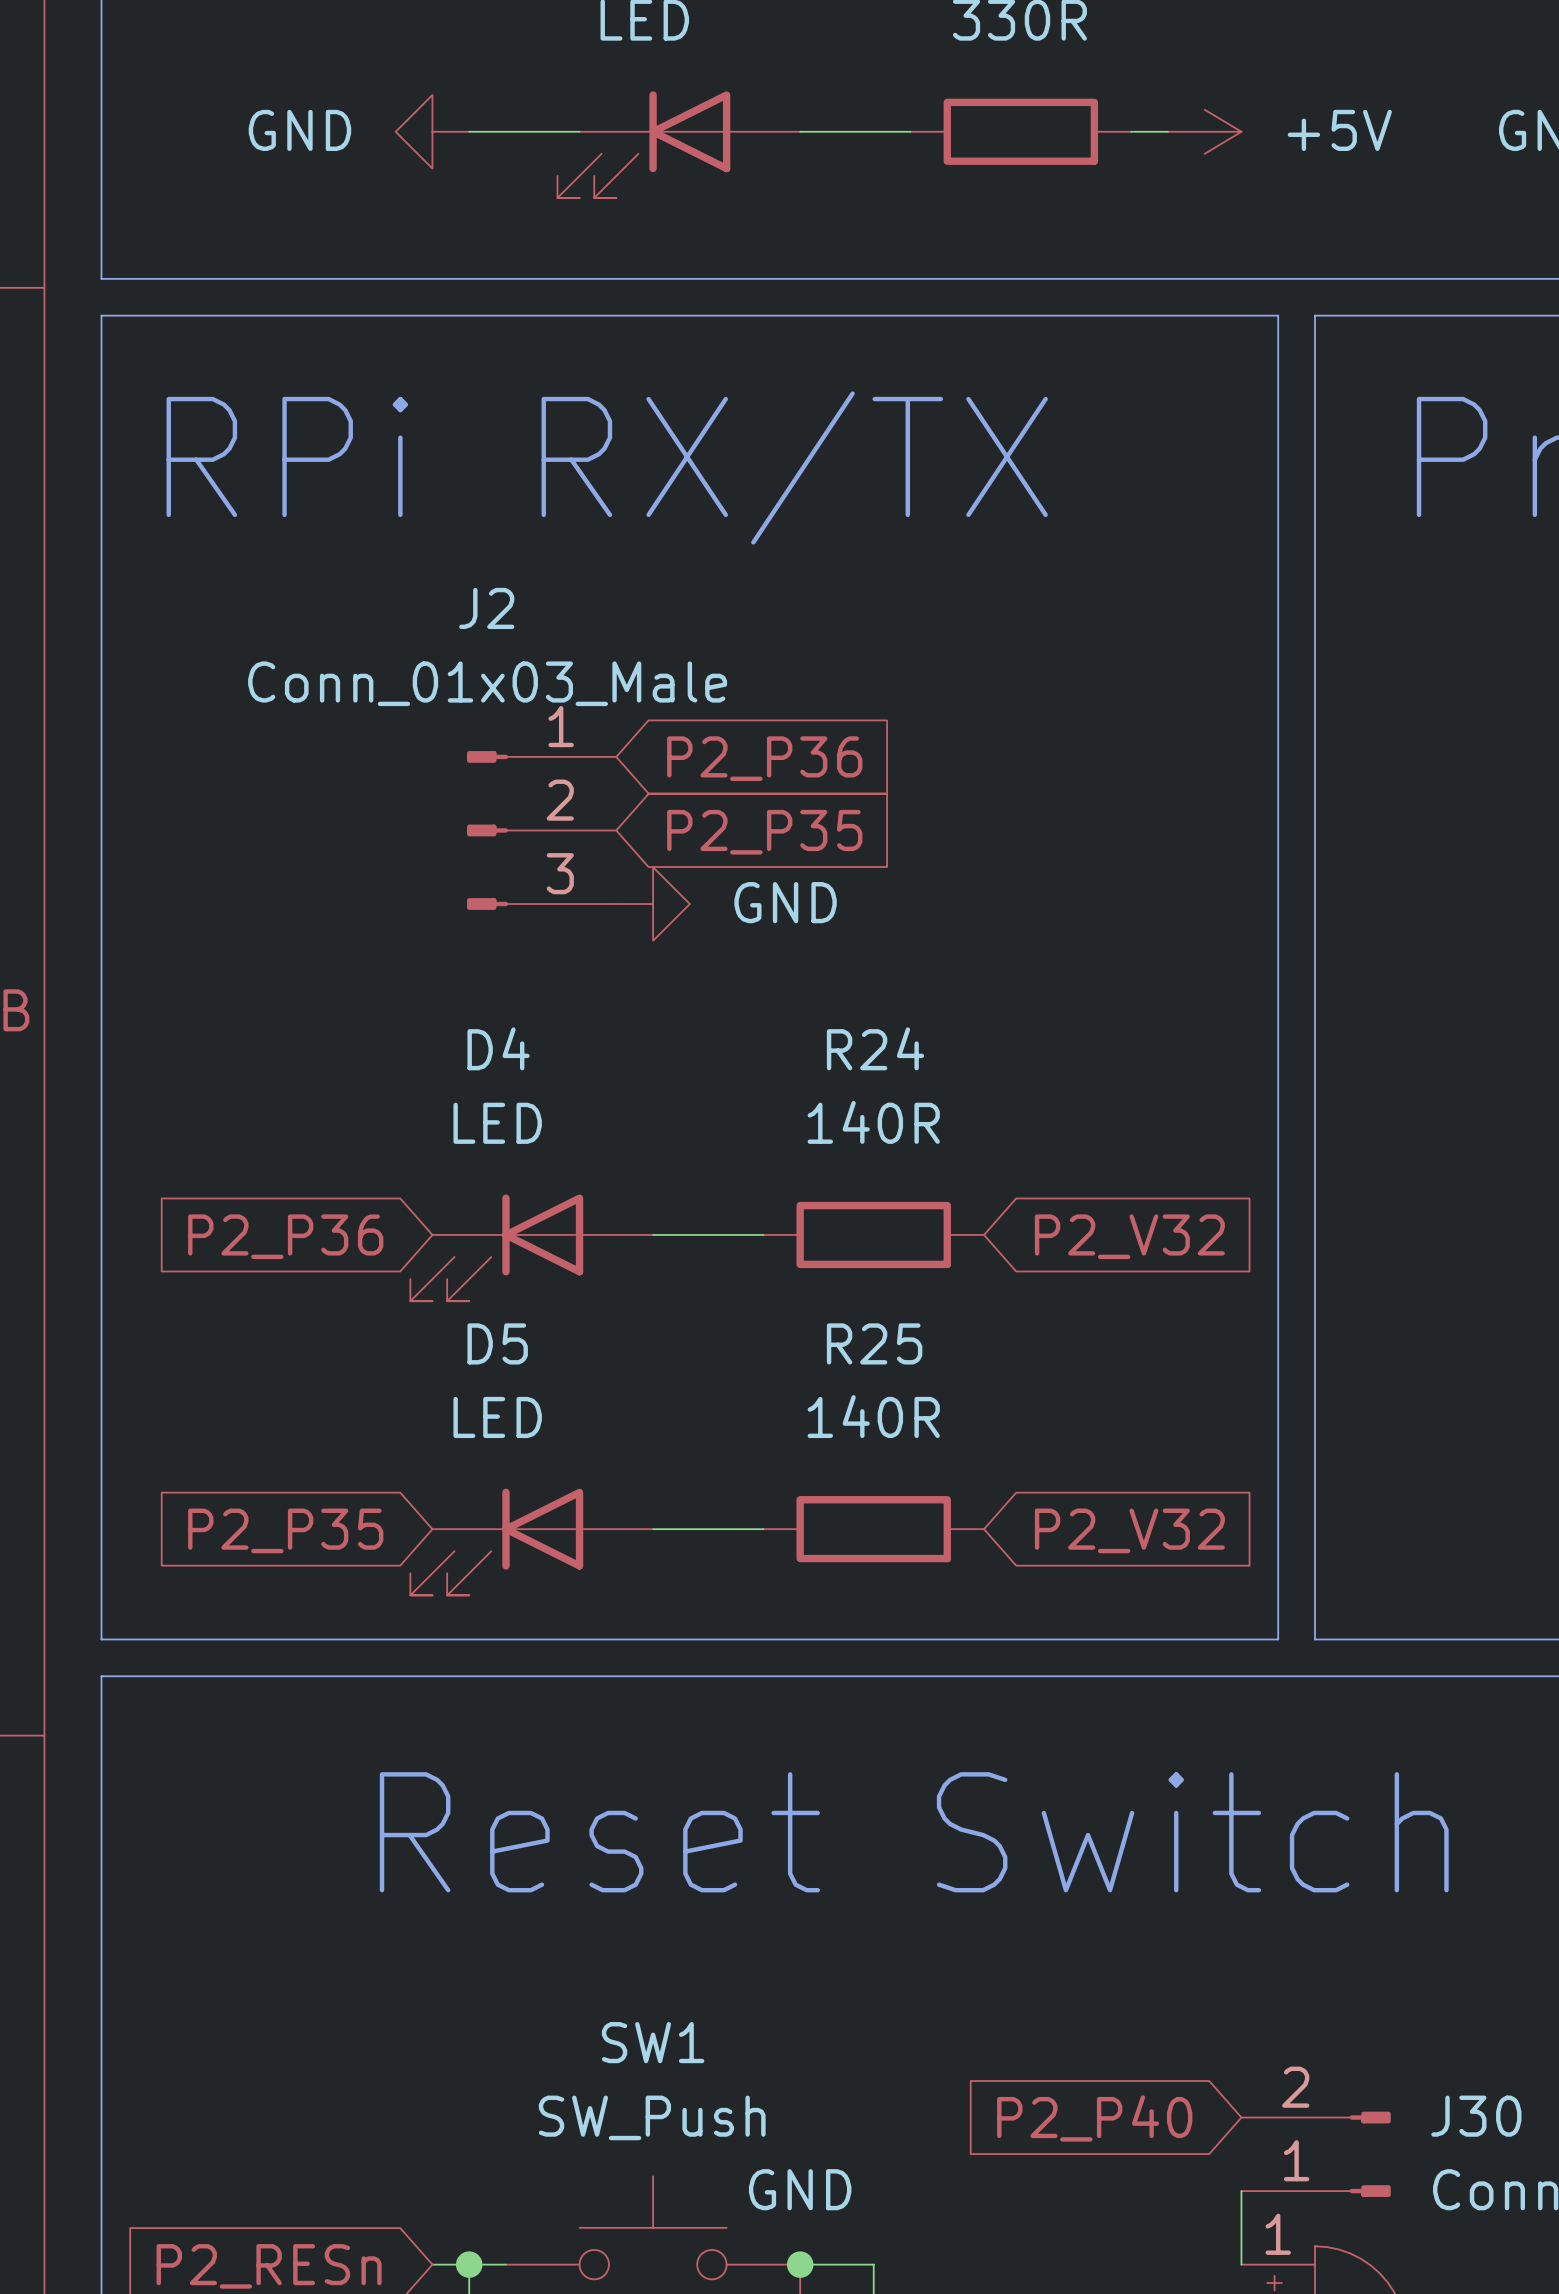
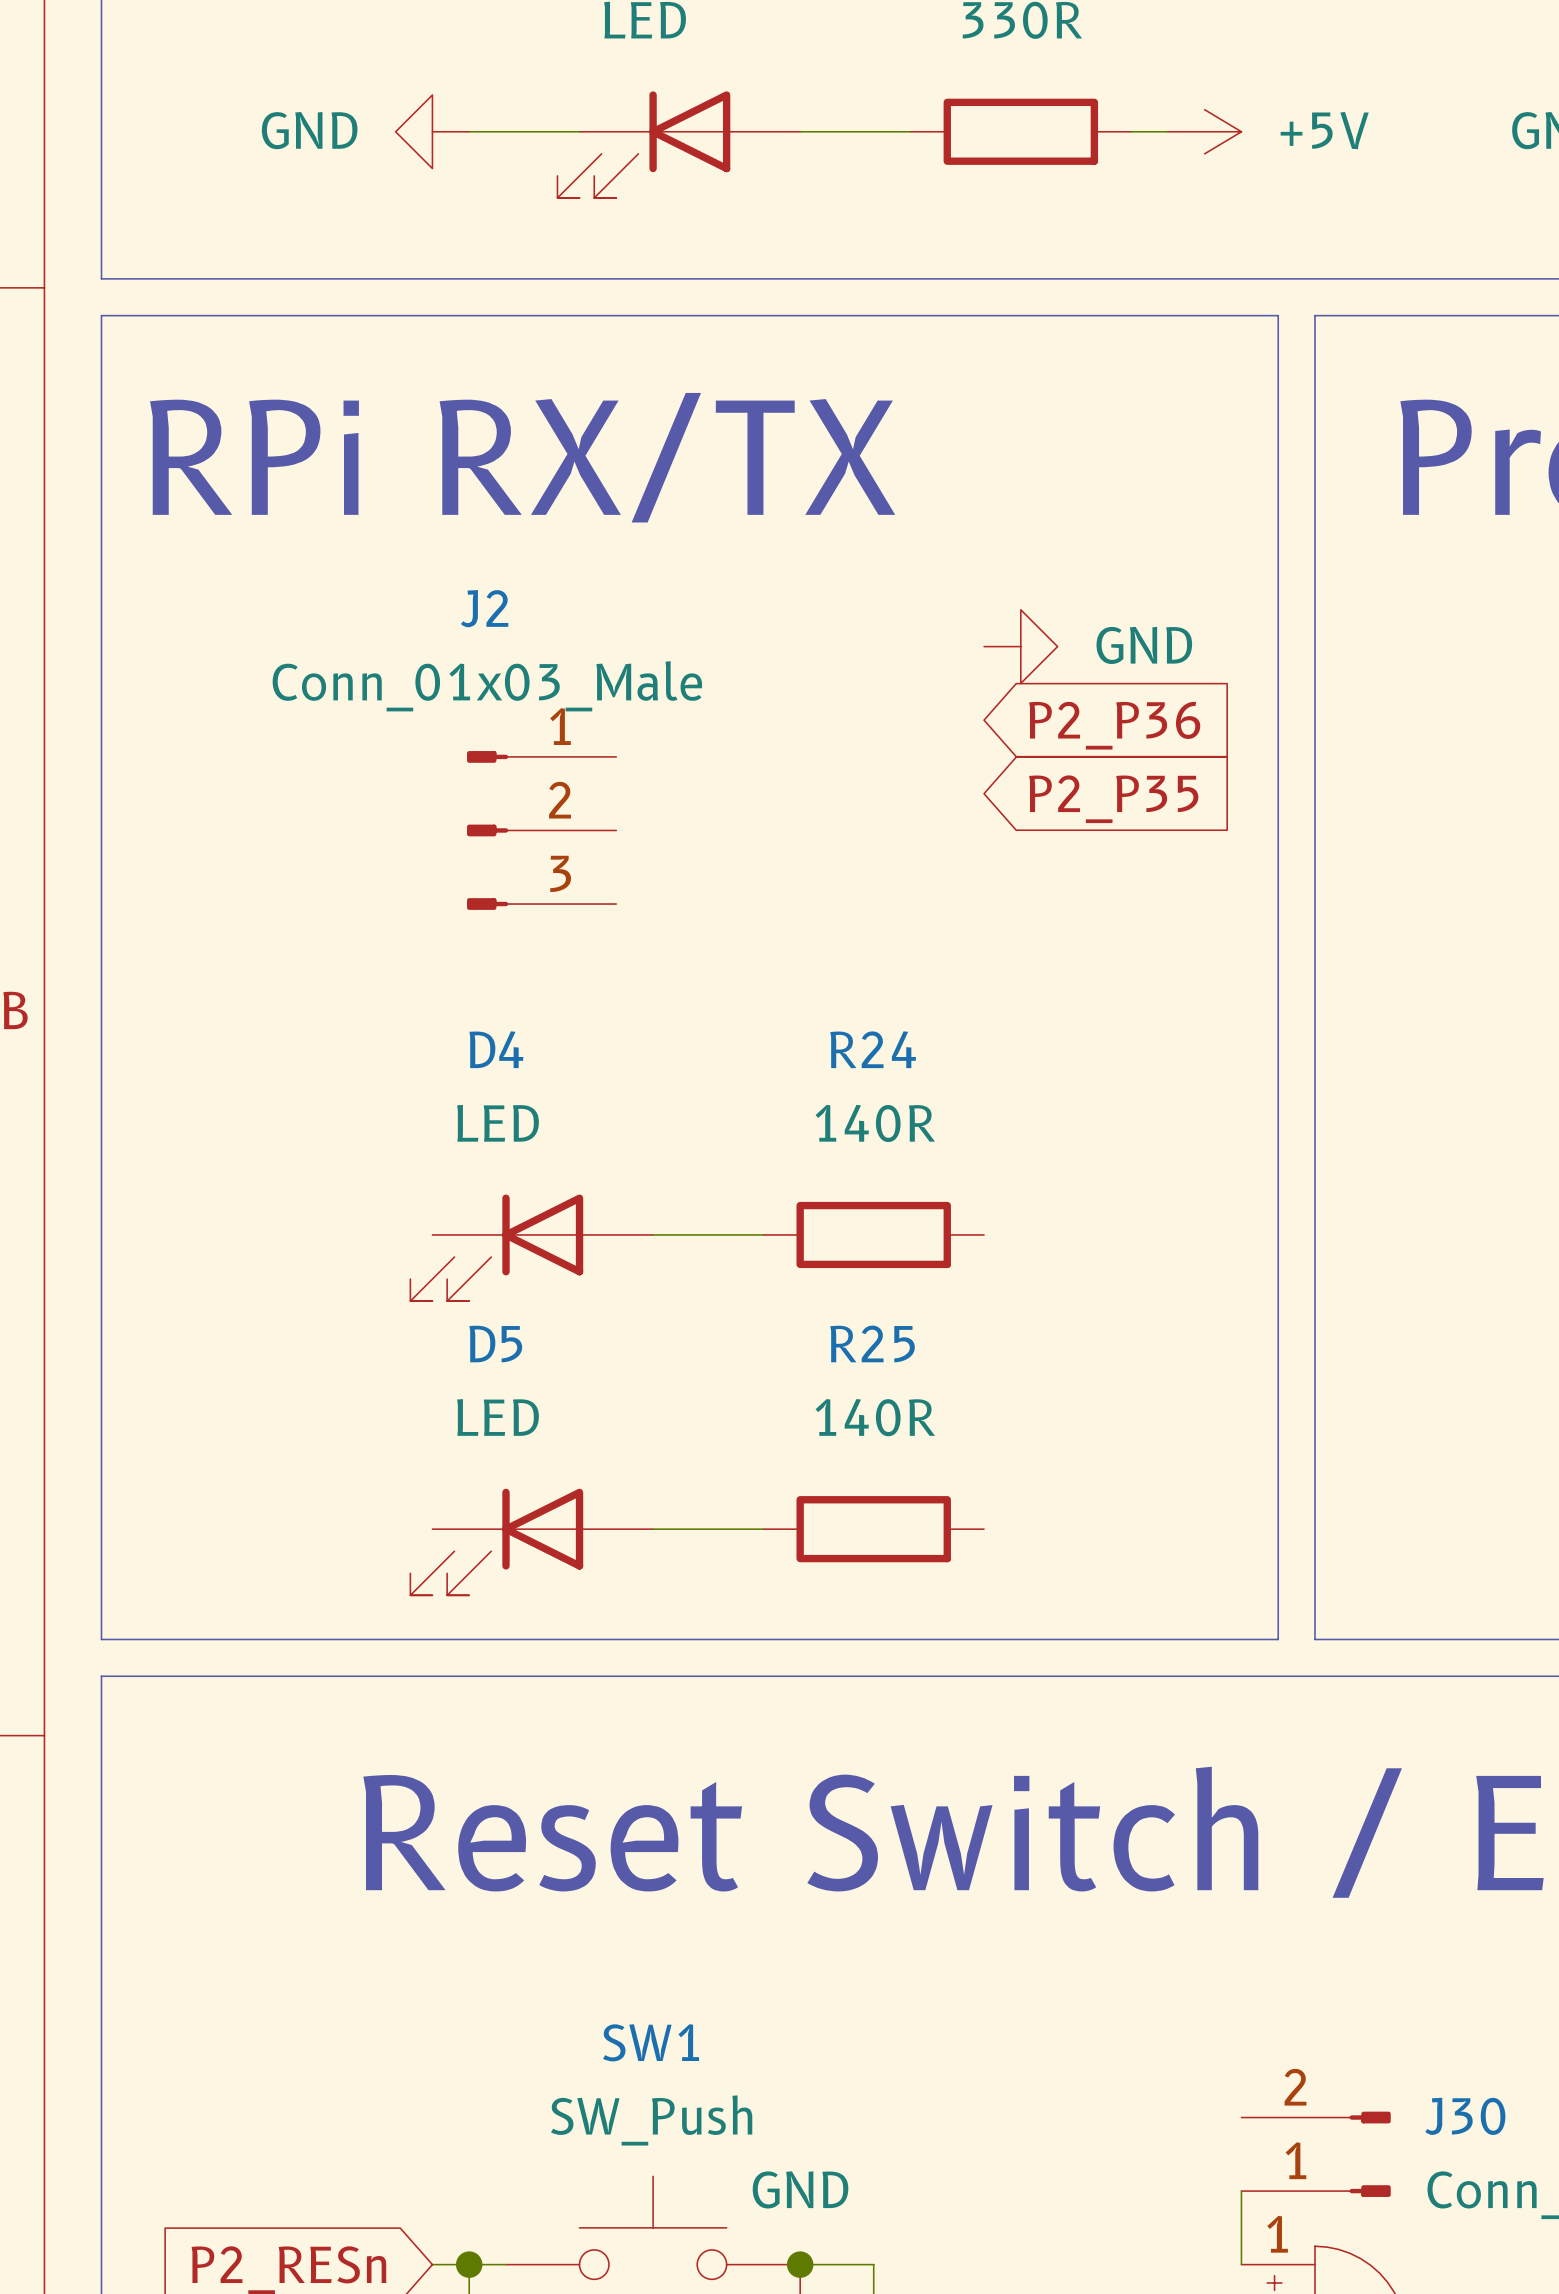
global label position: P2_P36 (764, 758) -> P2_P36 (1114, 725)
global label position: P2_P35 (764, 832) -> P2_P35 (1113, 799)
power symbol position: GND (653, 904) -> GND (1020, 646)
global label: P2_P36 (285, 1236) -> none
global label: P2_V32 (1129, 1236) -> none
global label: P2_P35 (285, 1530) -> none
global label: P2_V32 (1129, 1530) -> none
global label: P2_P40 (1094, 2118) -> none

